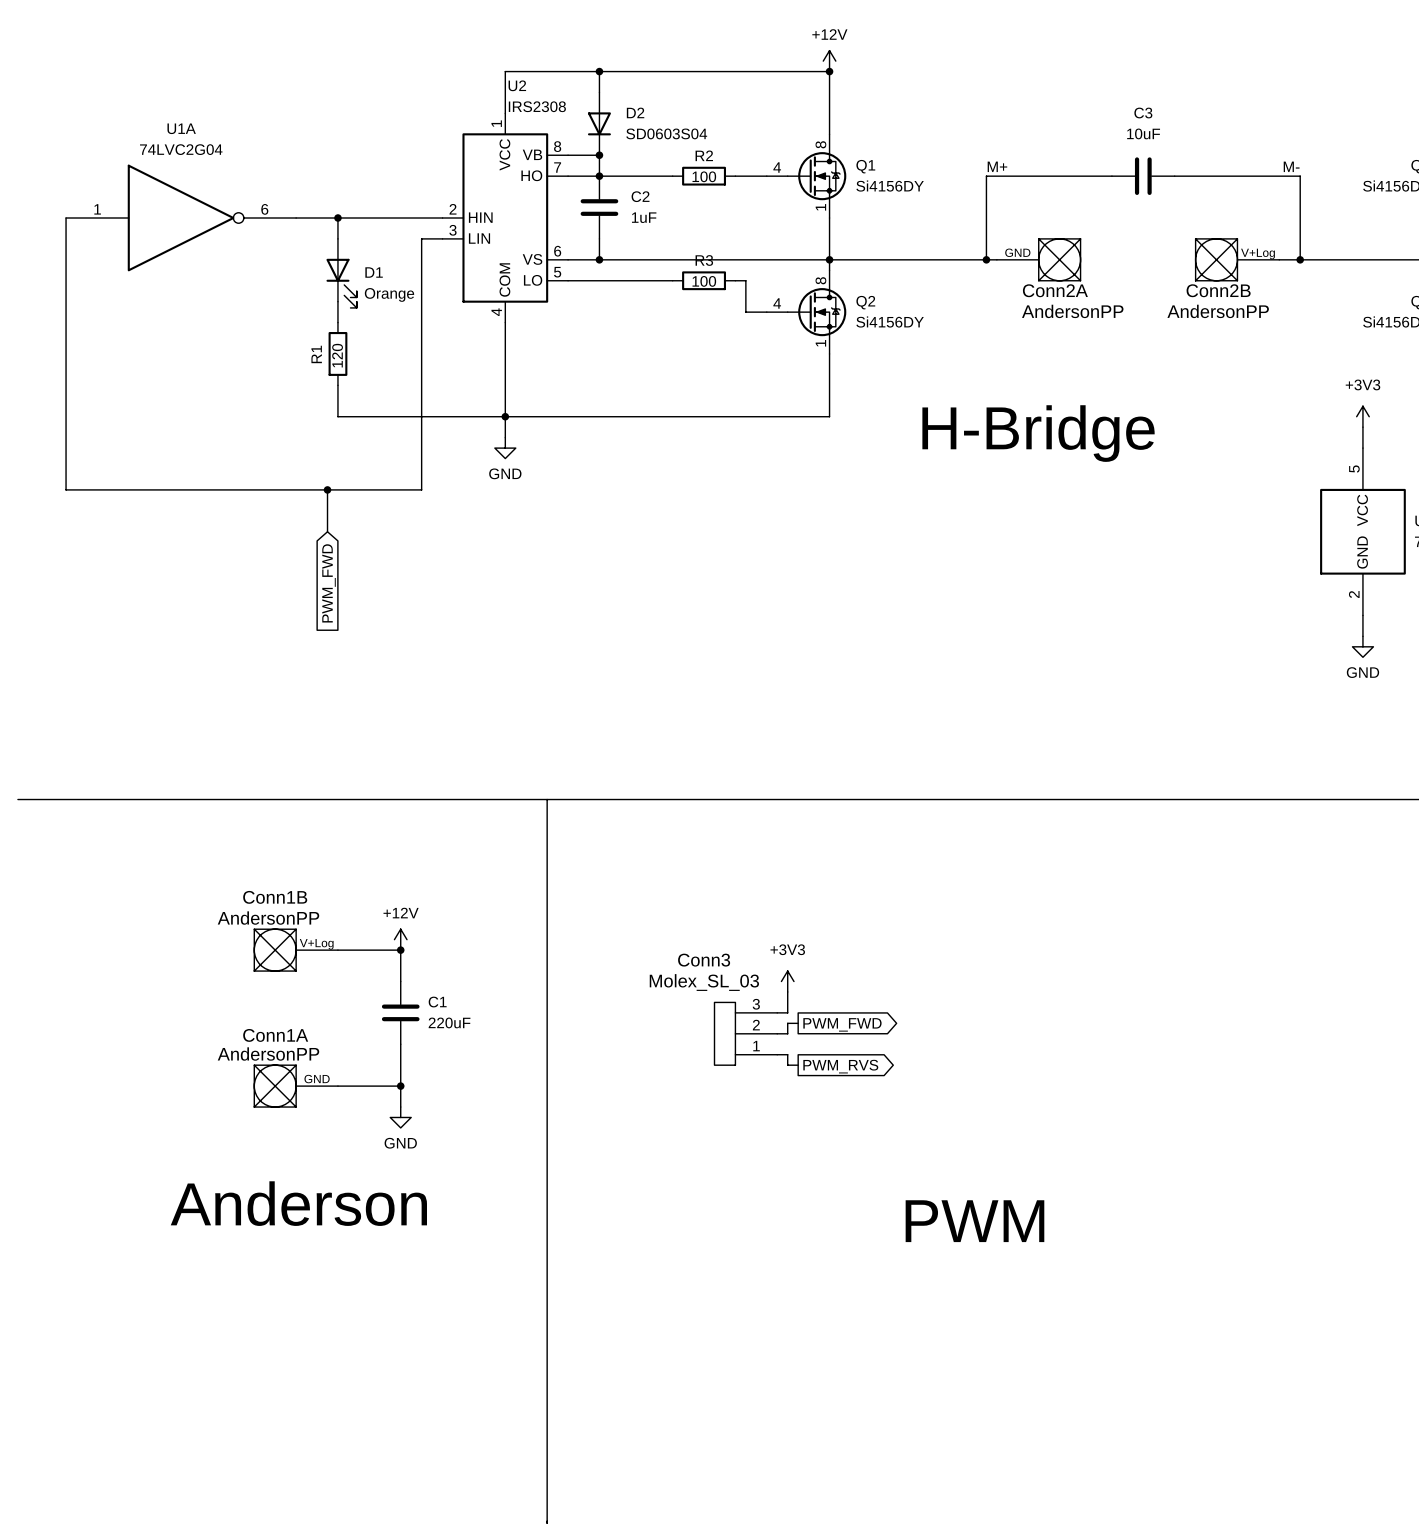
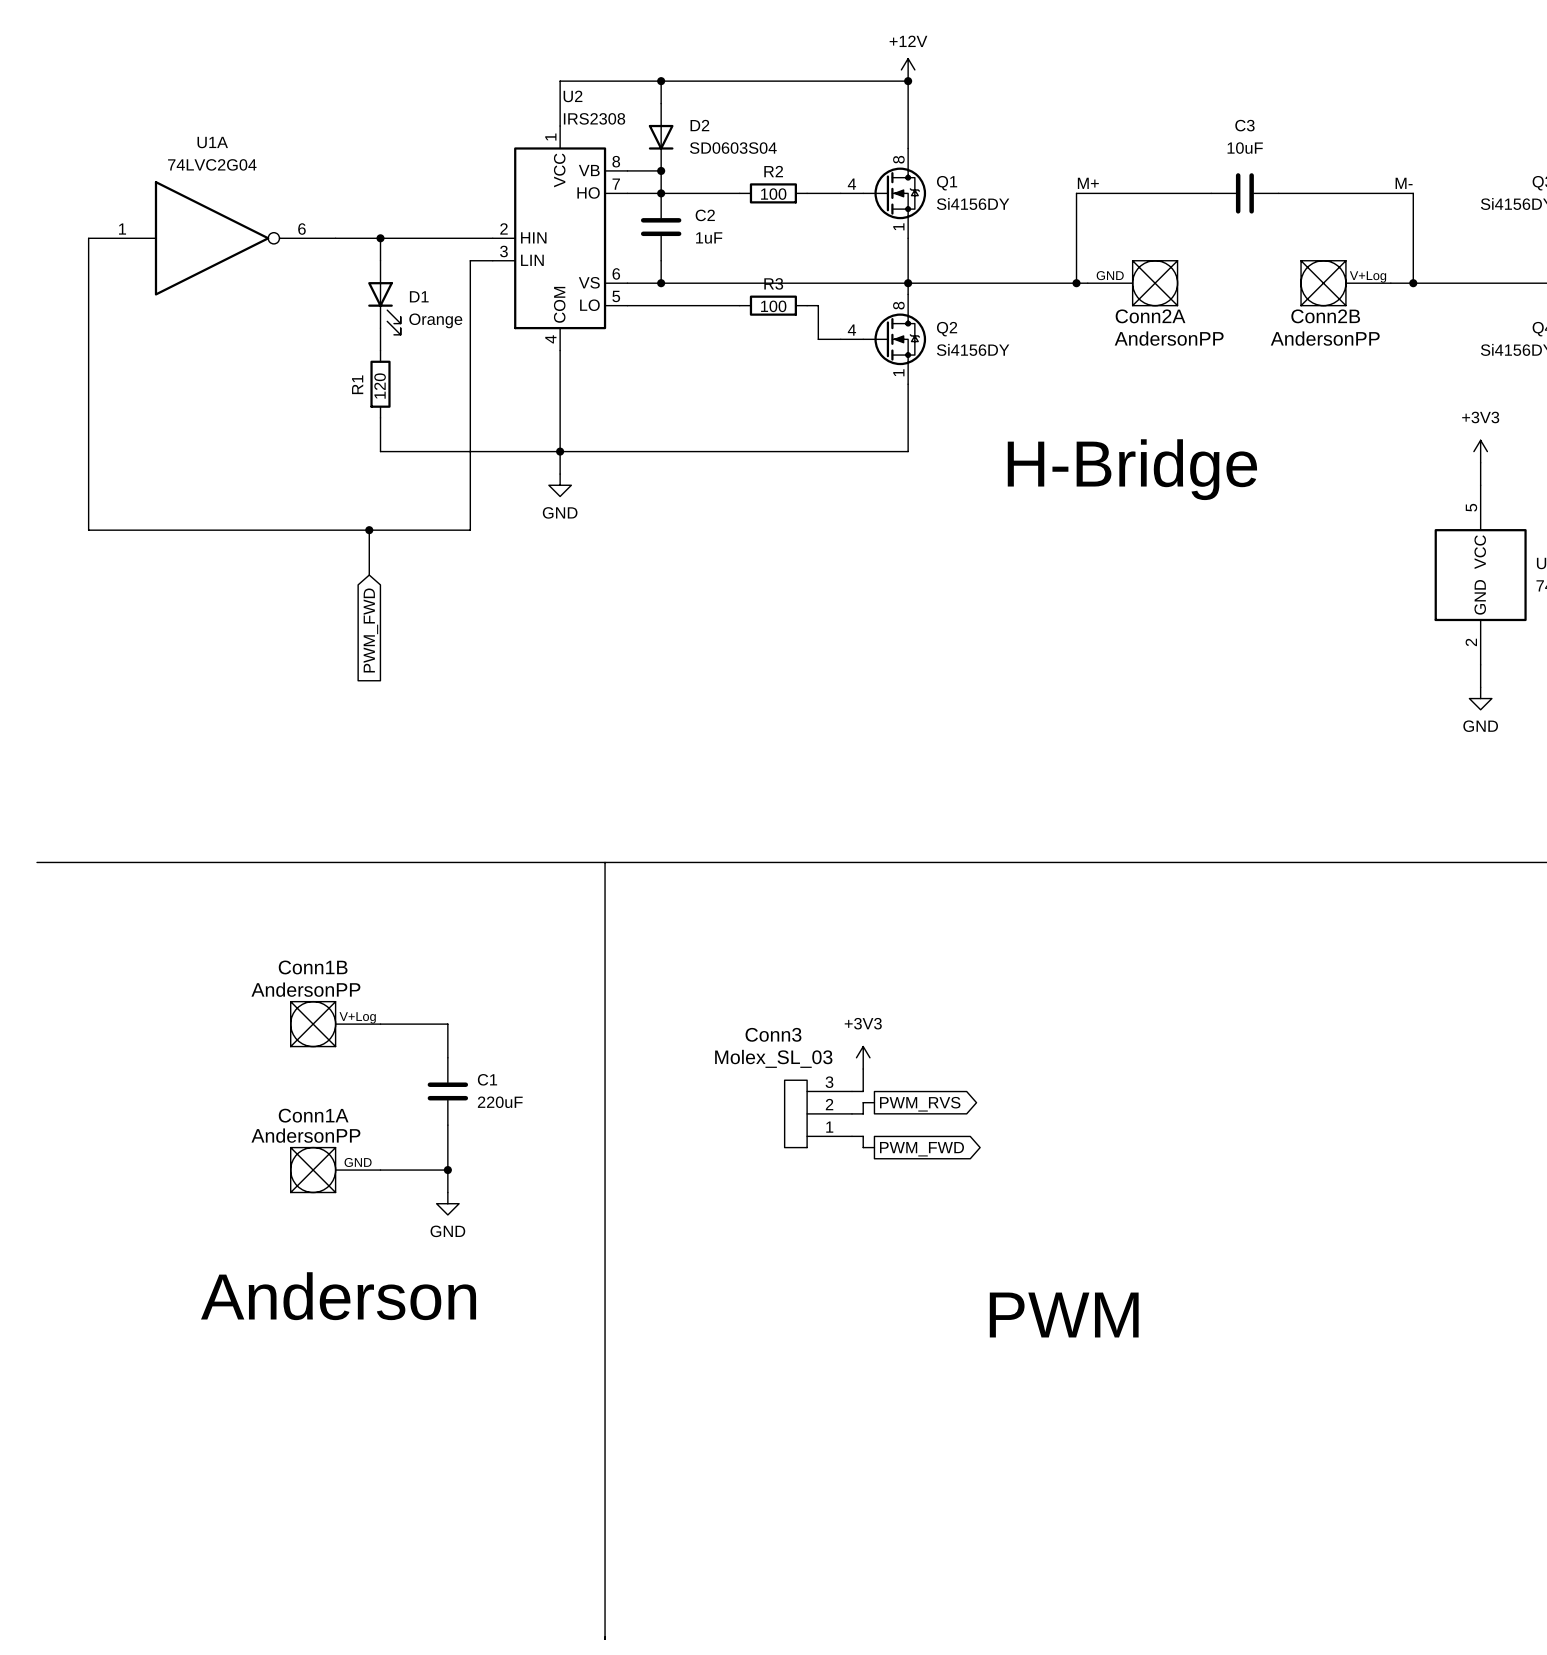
power symbol: +12V (400, 939) -> none
junction: (400, 950) -> none
global label: PWM_FWD (842, 1024) -> PWM_RVS (920, 1104)
global label: PWM_RVS (840, 1066) -> PWM_FWD (921, 1149)

